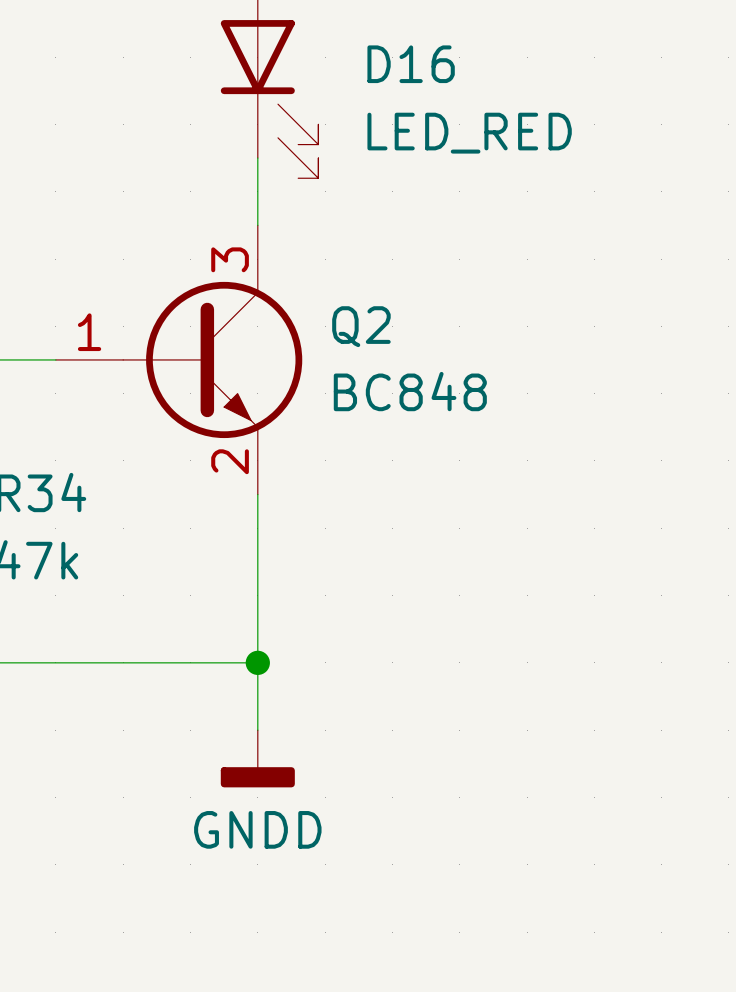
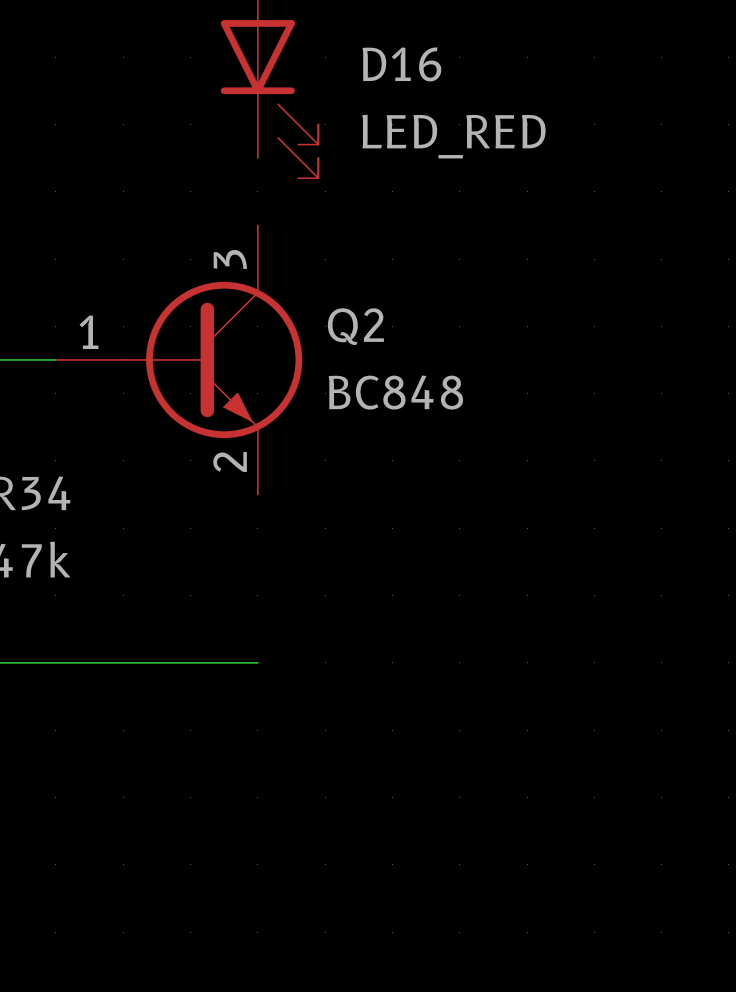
wire: (257, 158) (257, 225) -> none
wire: (257, 494) (257, 730) -> none
junction: (257, 662) -> none
power symbol: GNDD (257, 758) -> none

